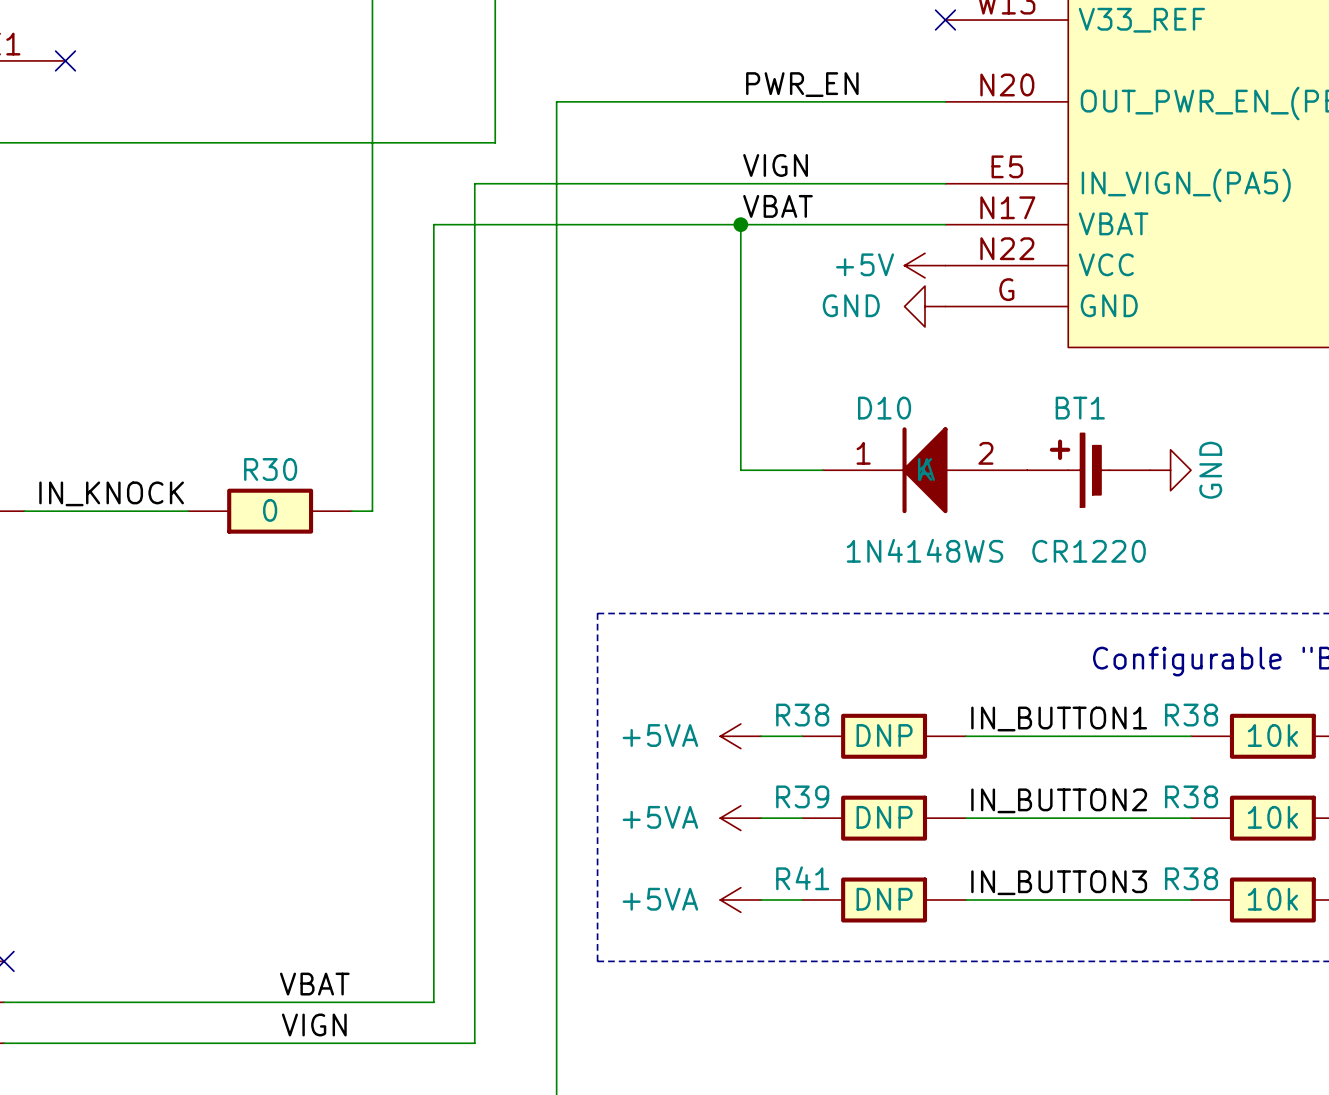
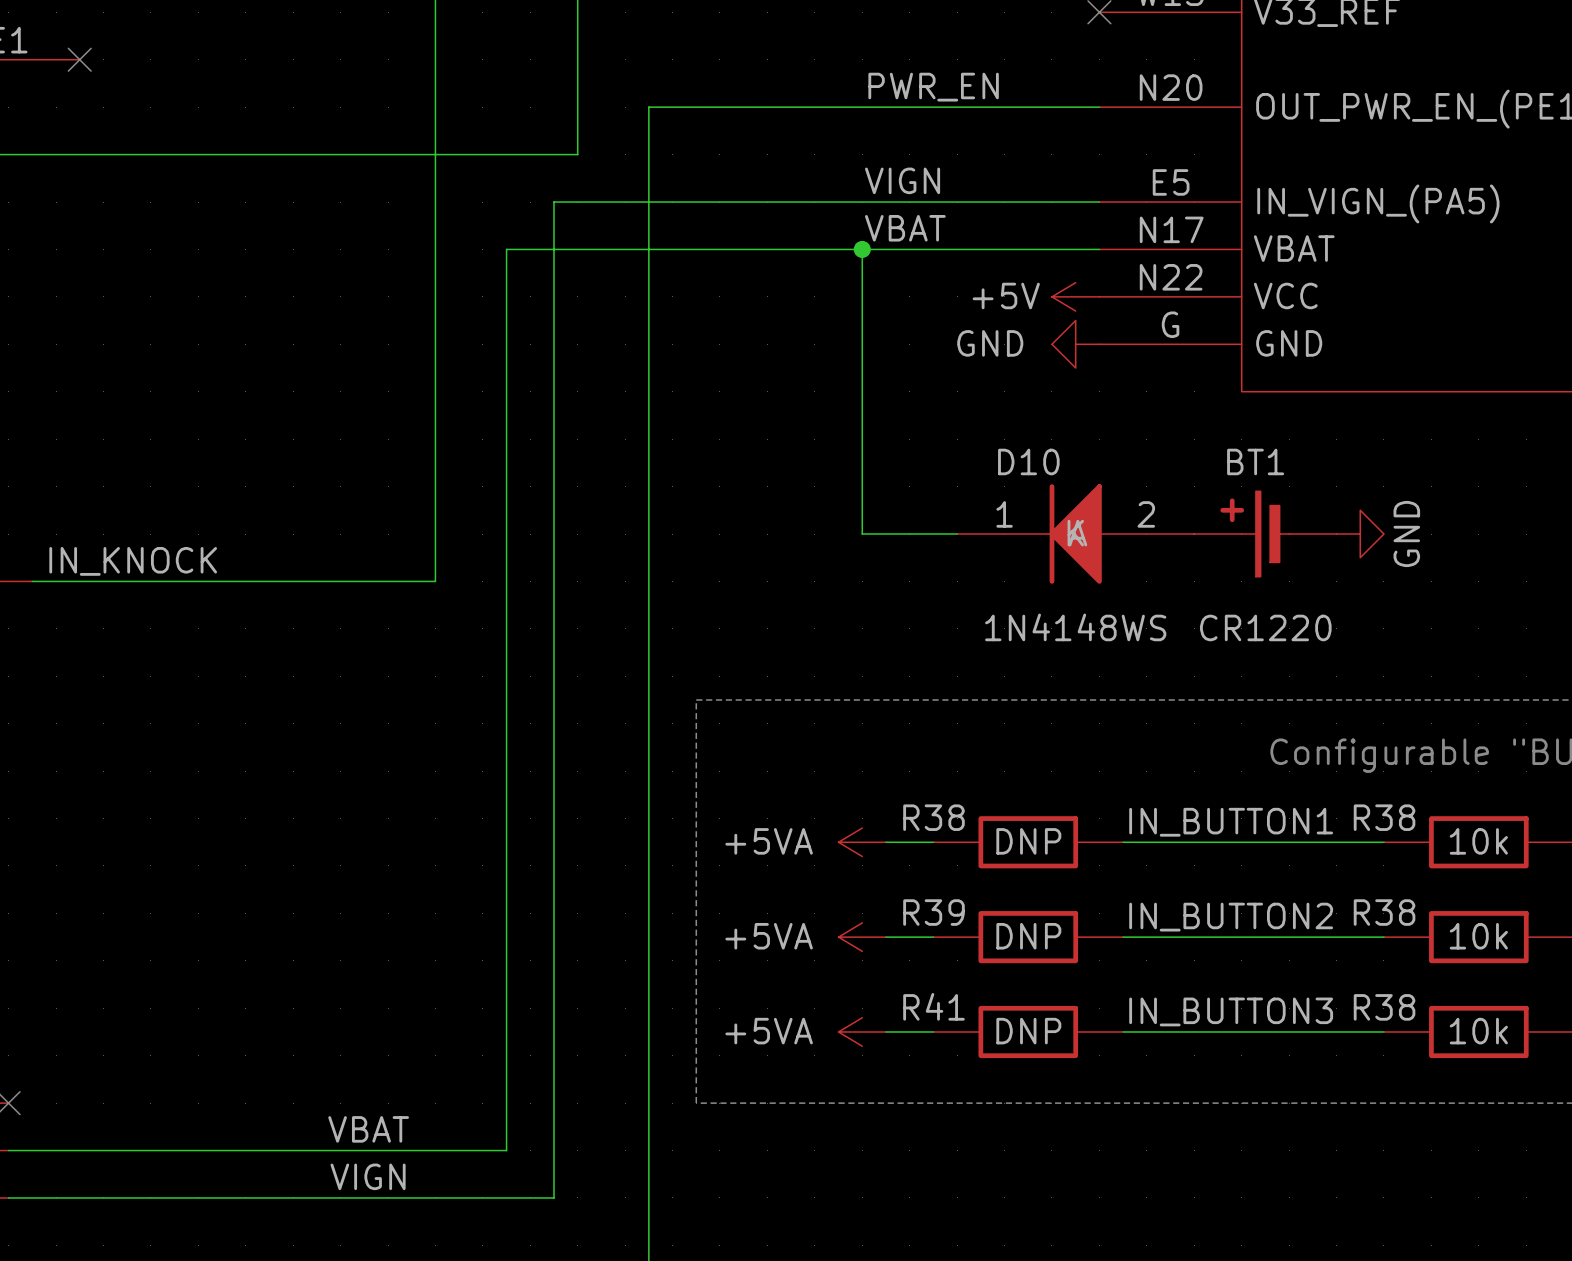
R30: 0 (270, 511) -> none

